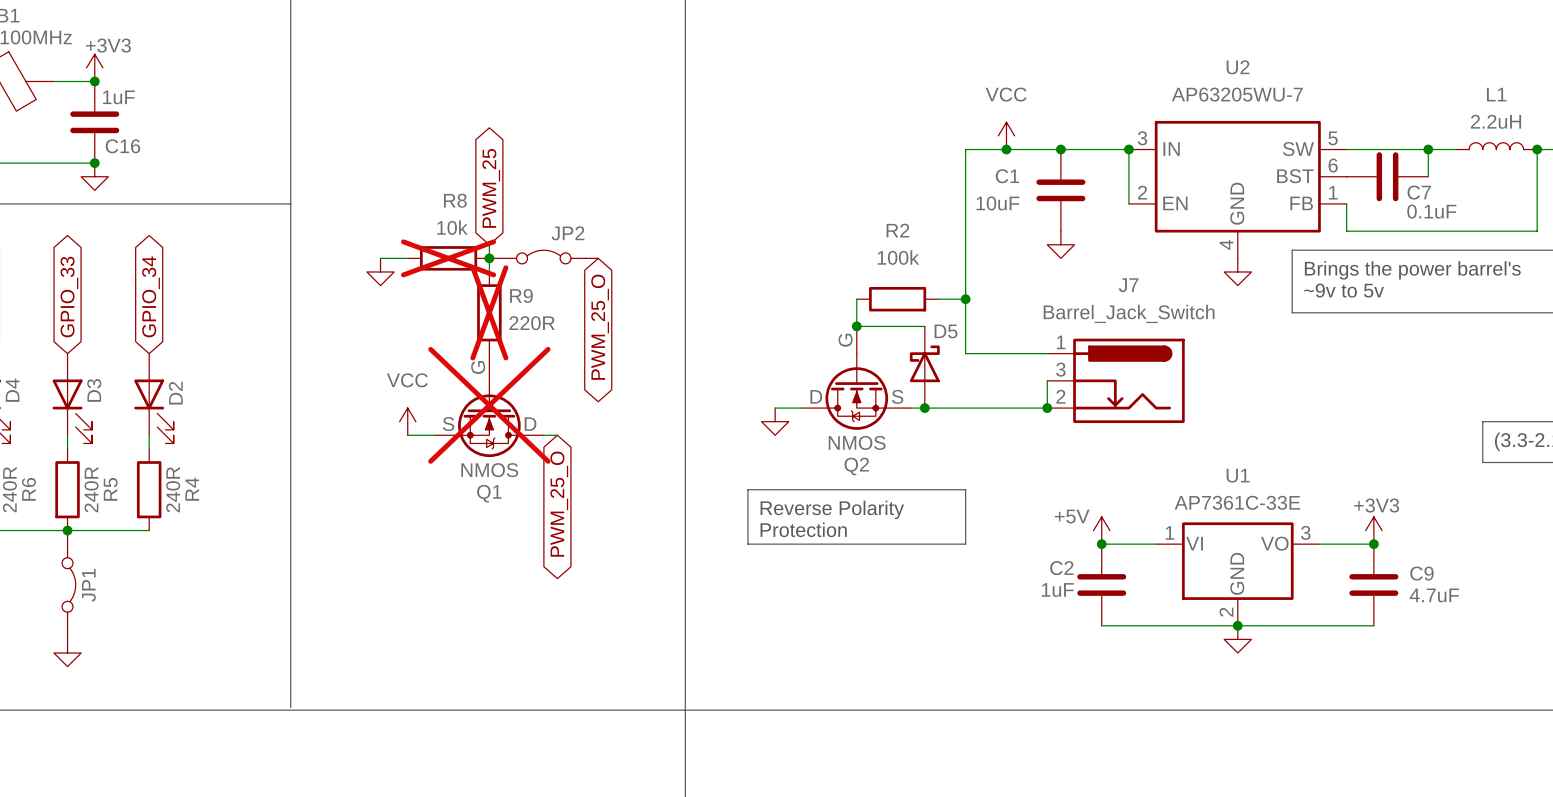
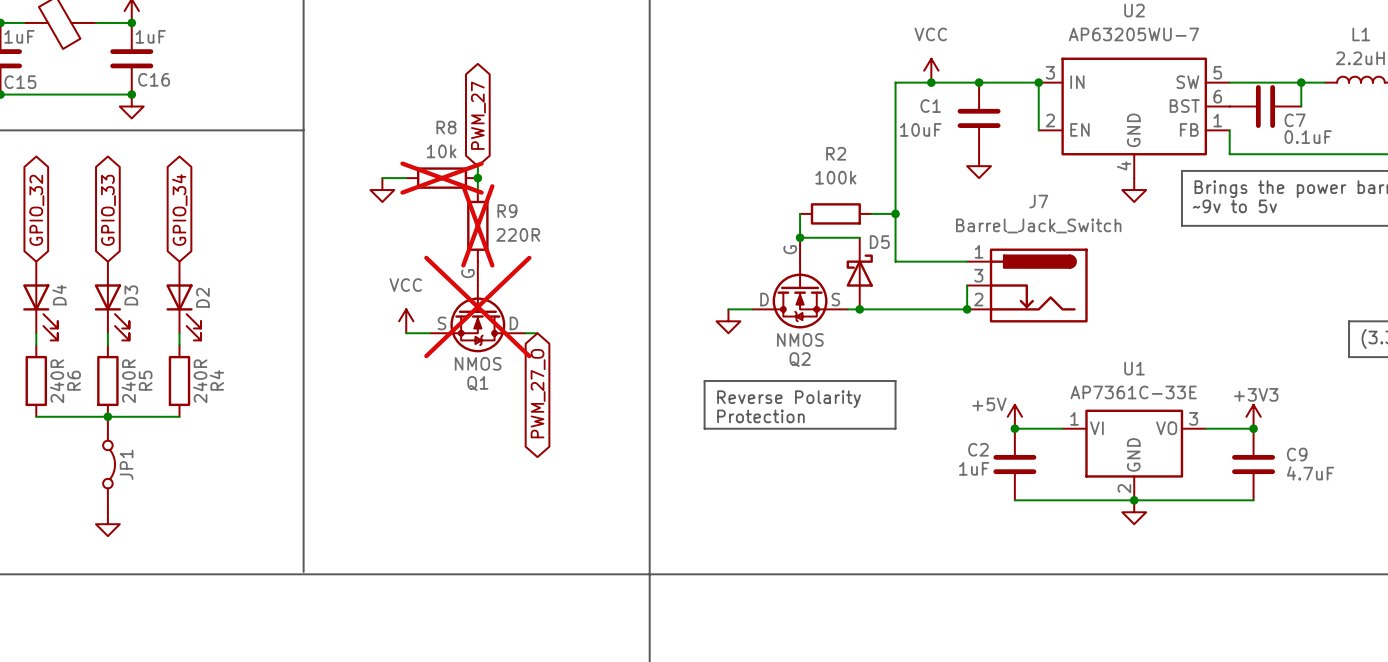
global label: PWM_25 (491, 188) -> PWM_27 (478, 115)
JP2: (543, 257) -> none
global label: PWM_25_O (600, 327) -> none
global label: PWM_25_O (559, 504) -> PWM_27_O (538, 393)

